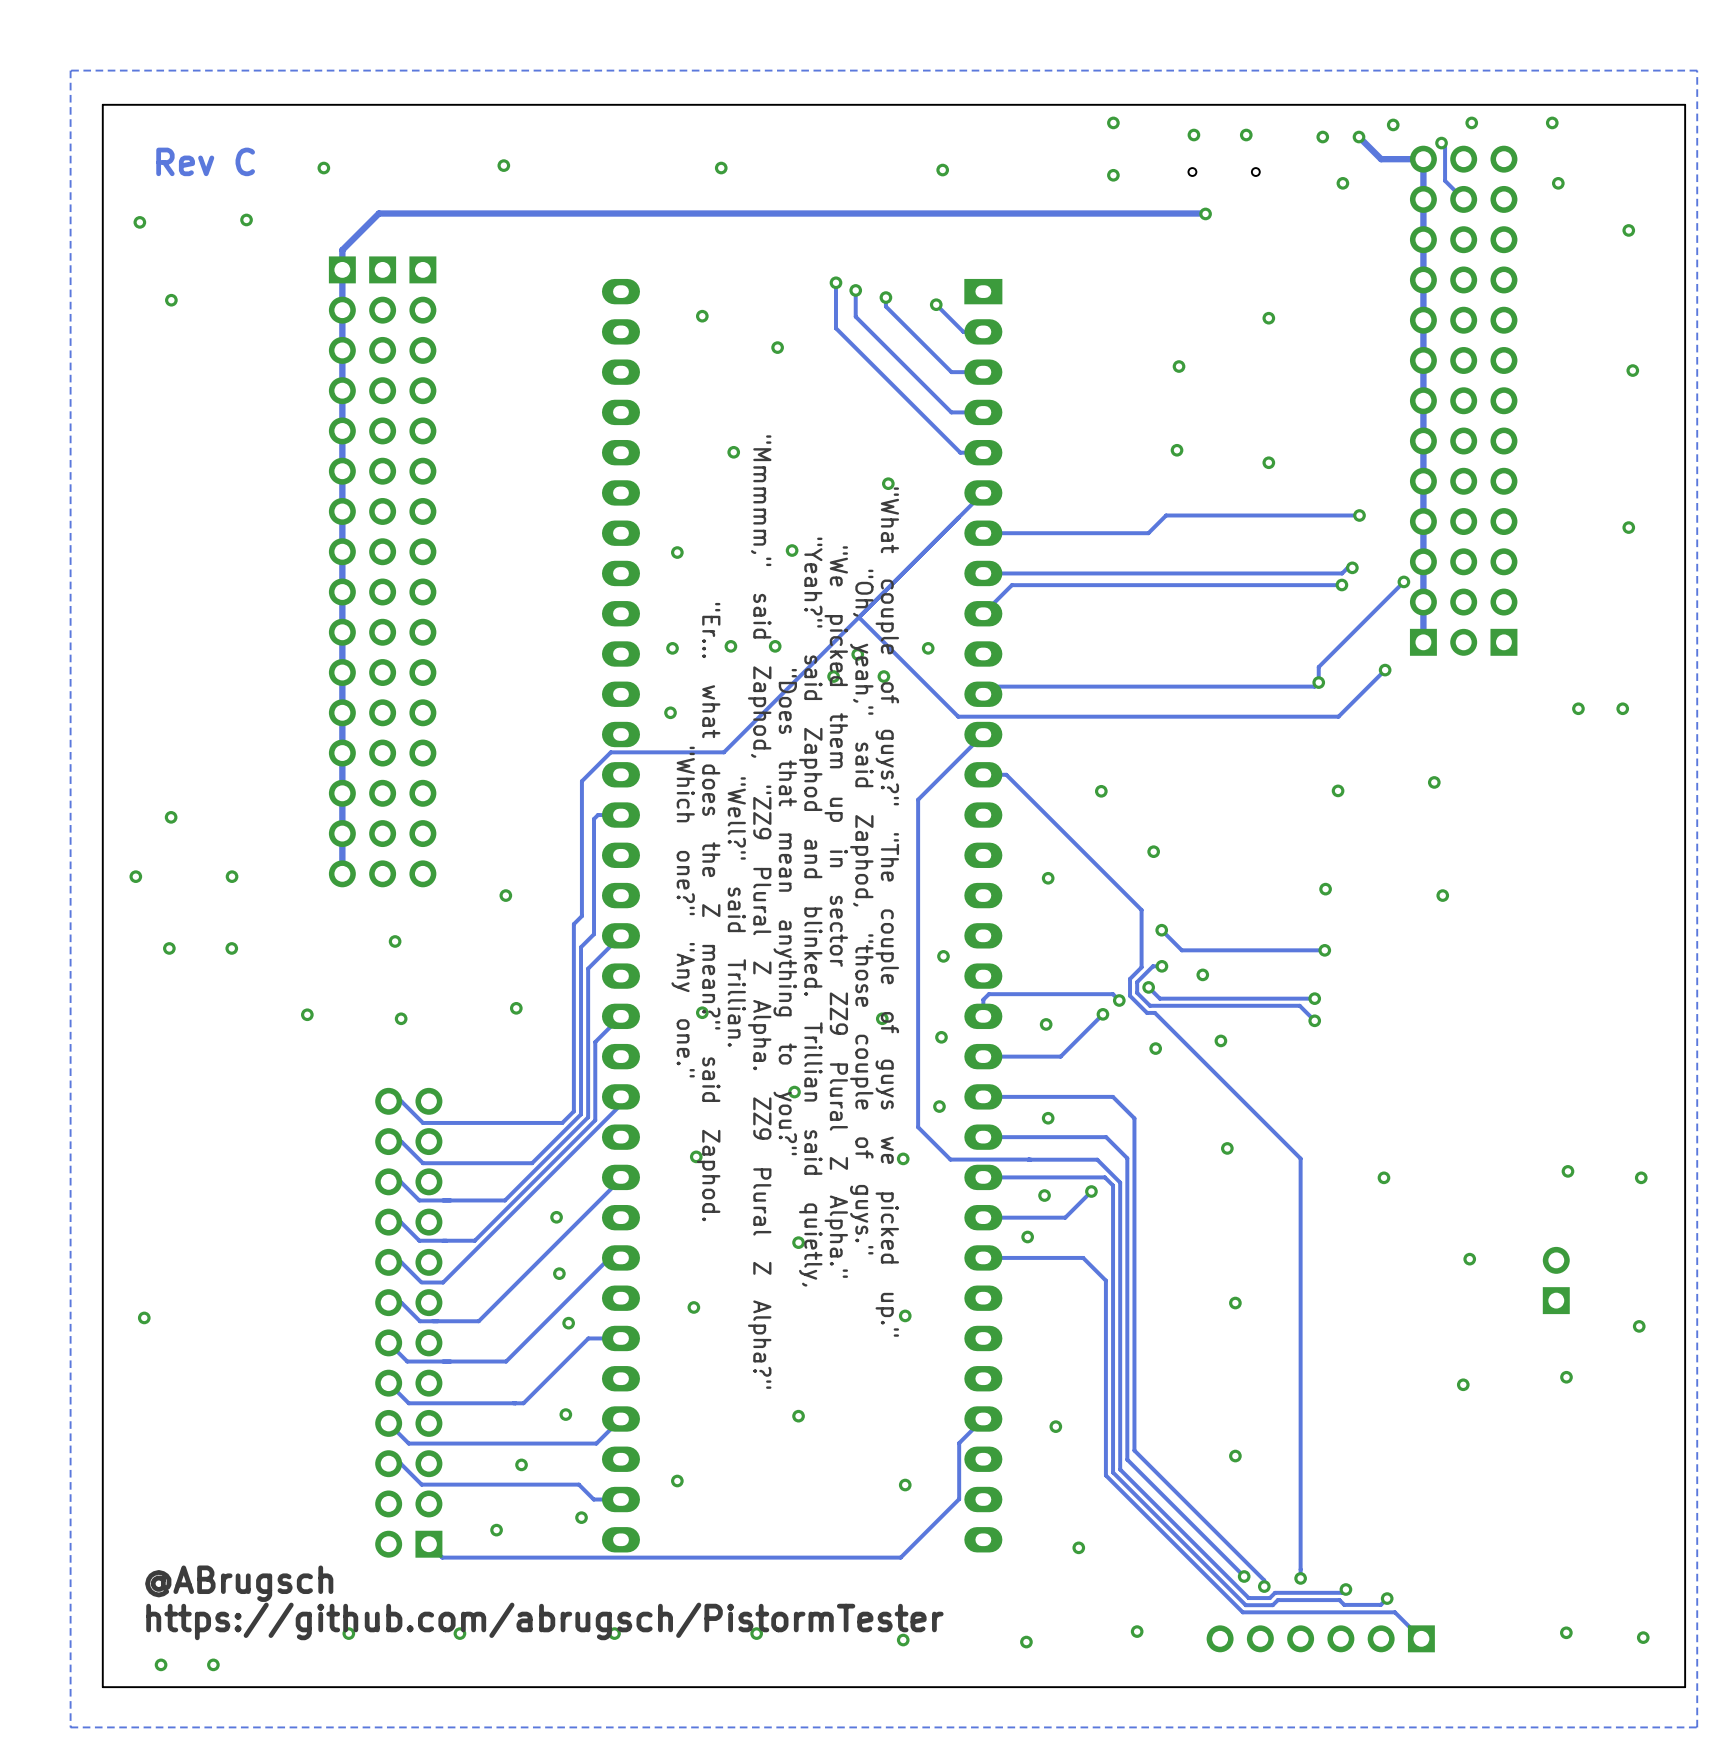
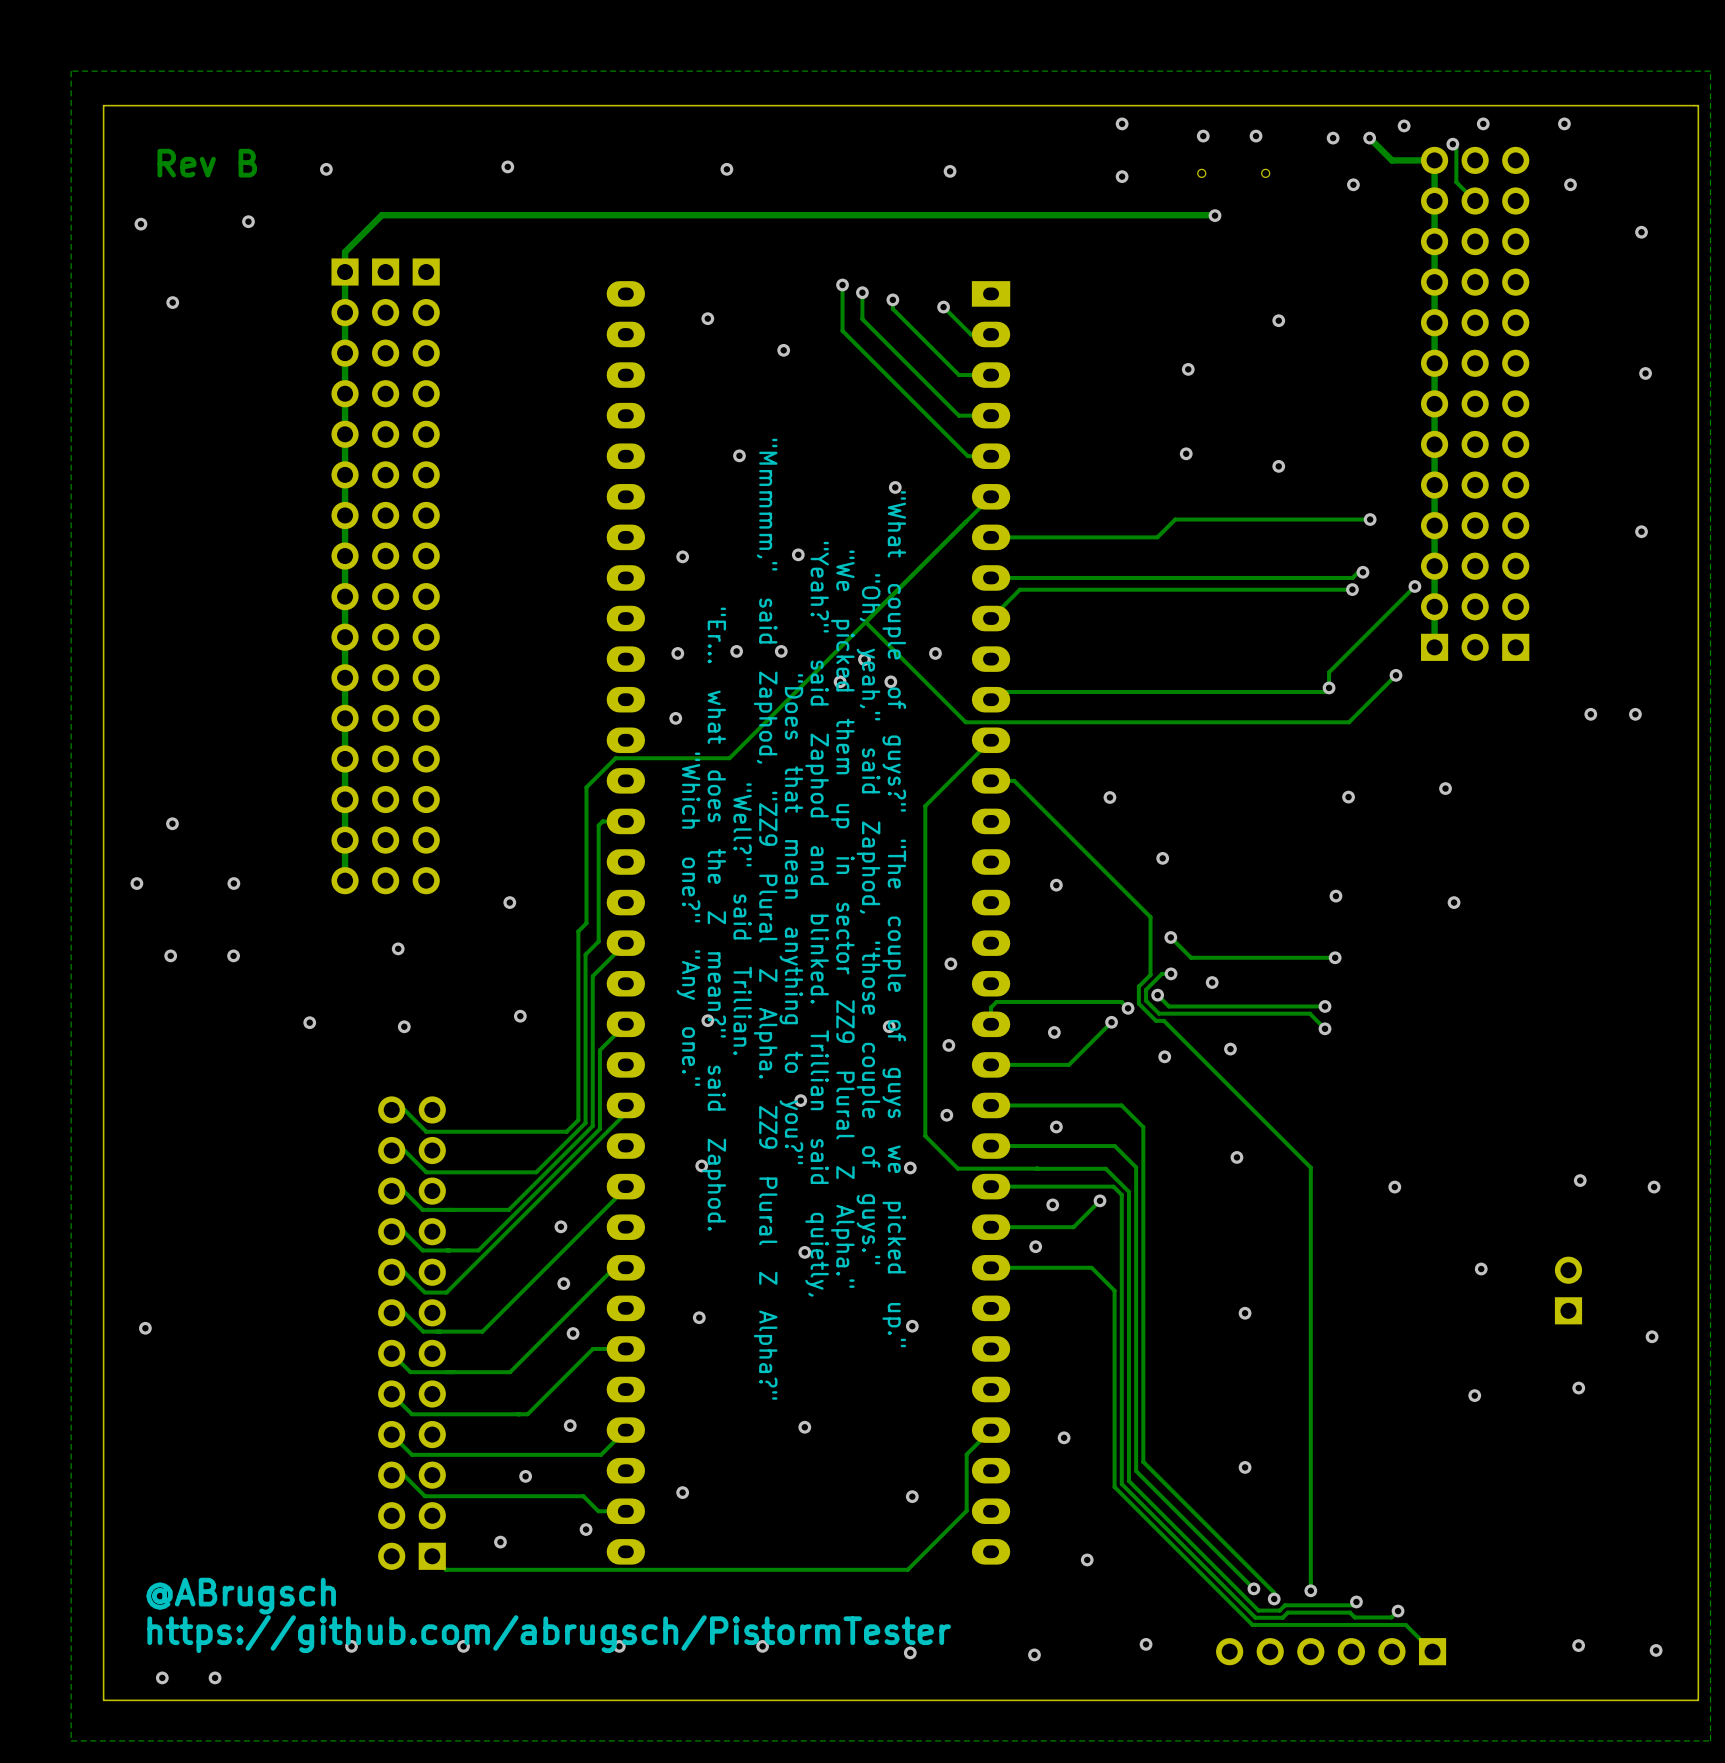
text: Rev C (205, 161) -> Rev B (207, 163)

